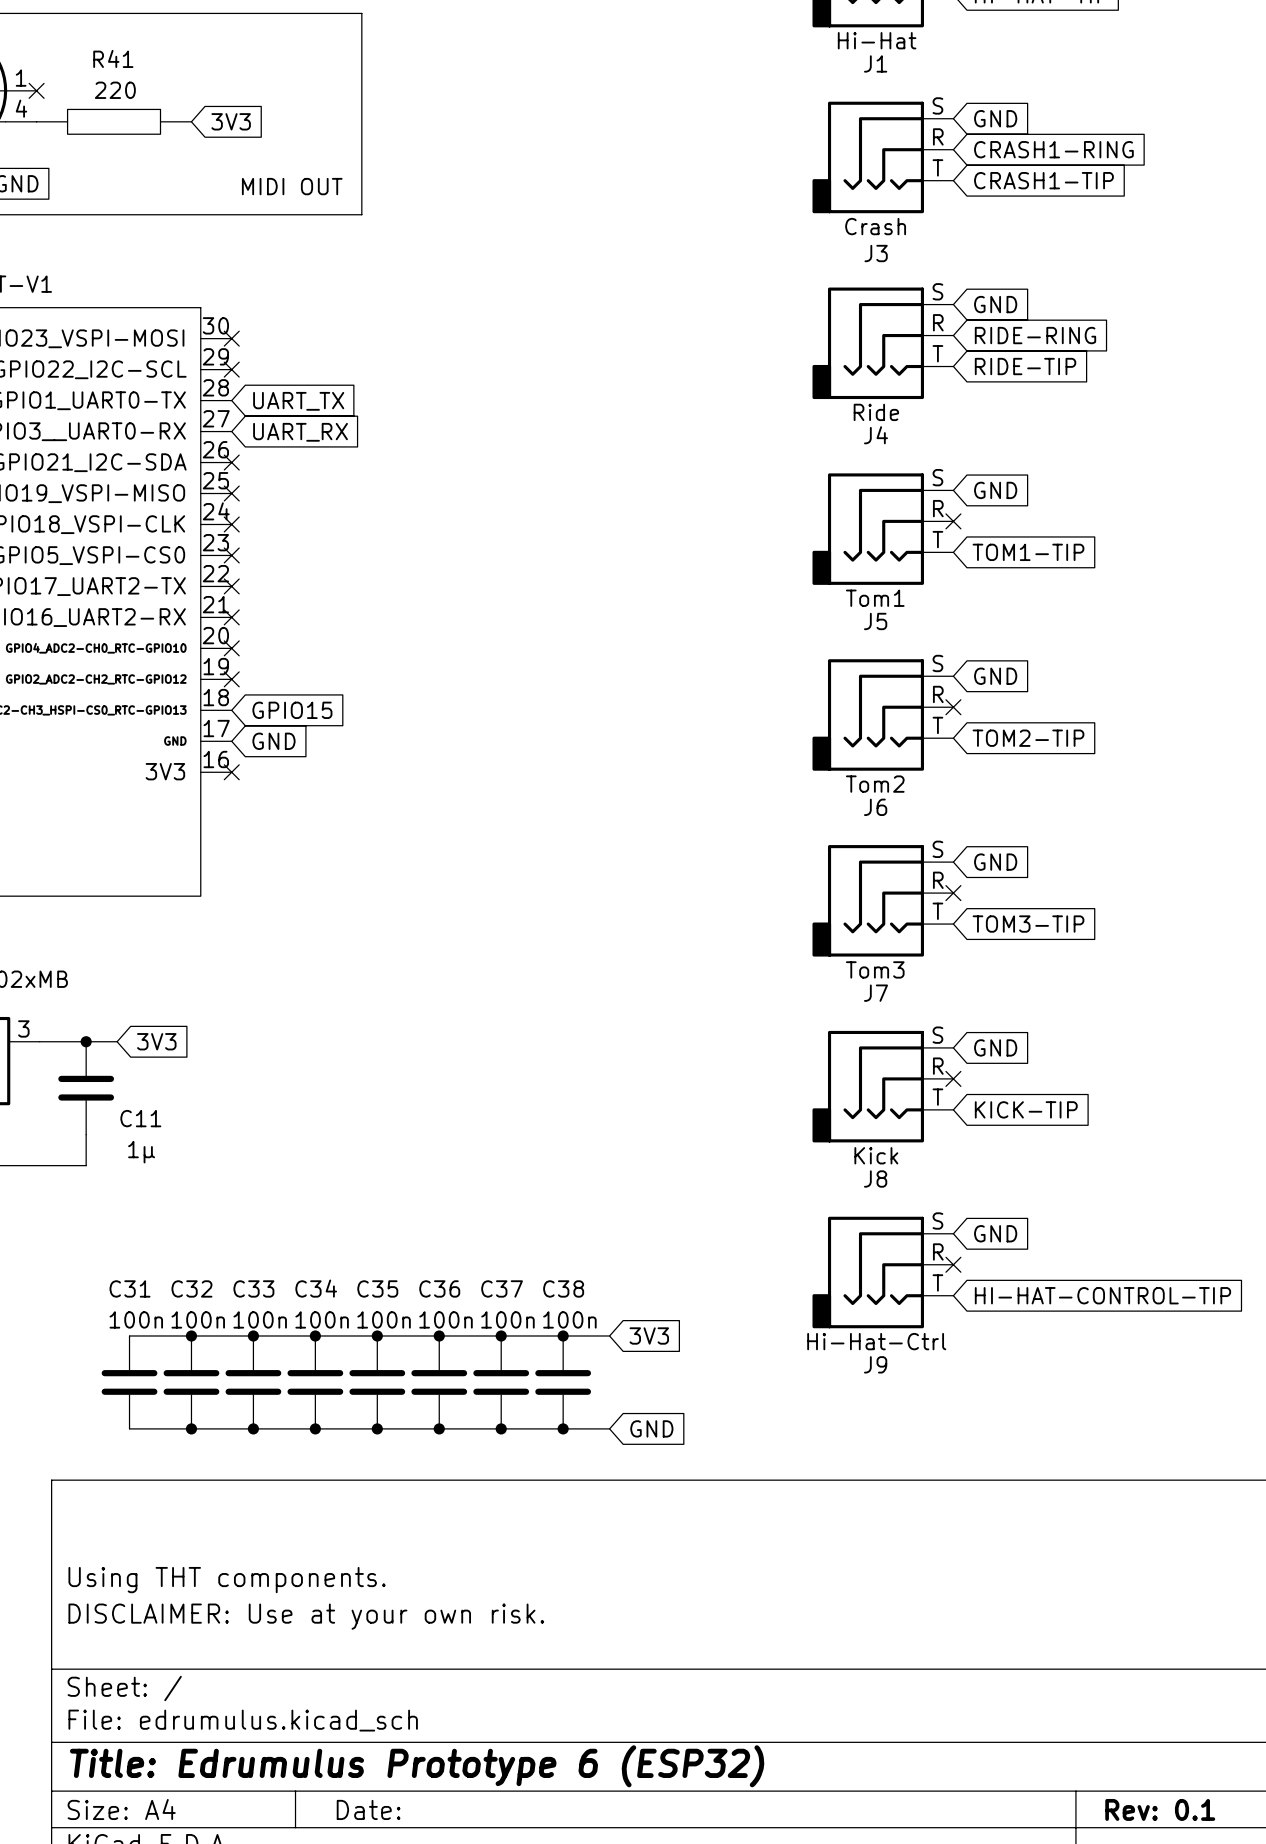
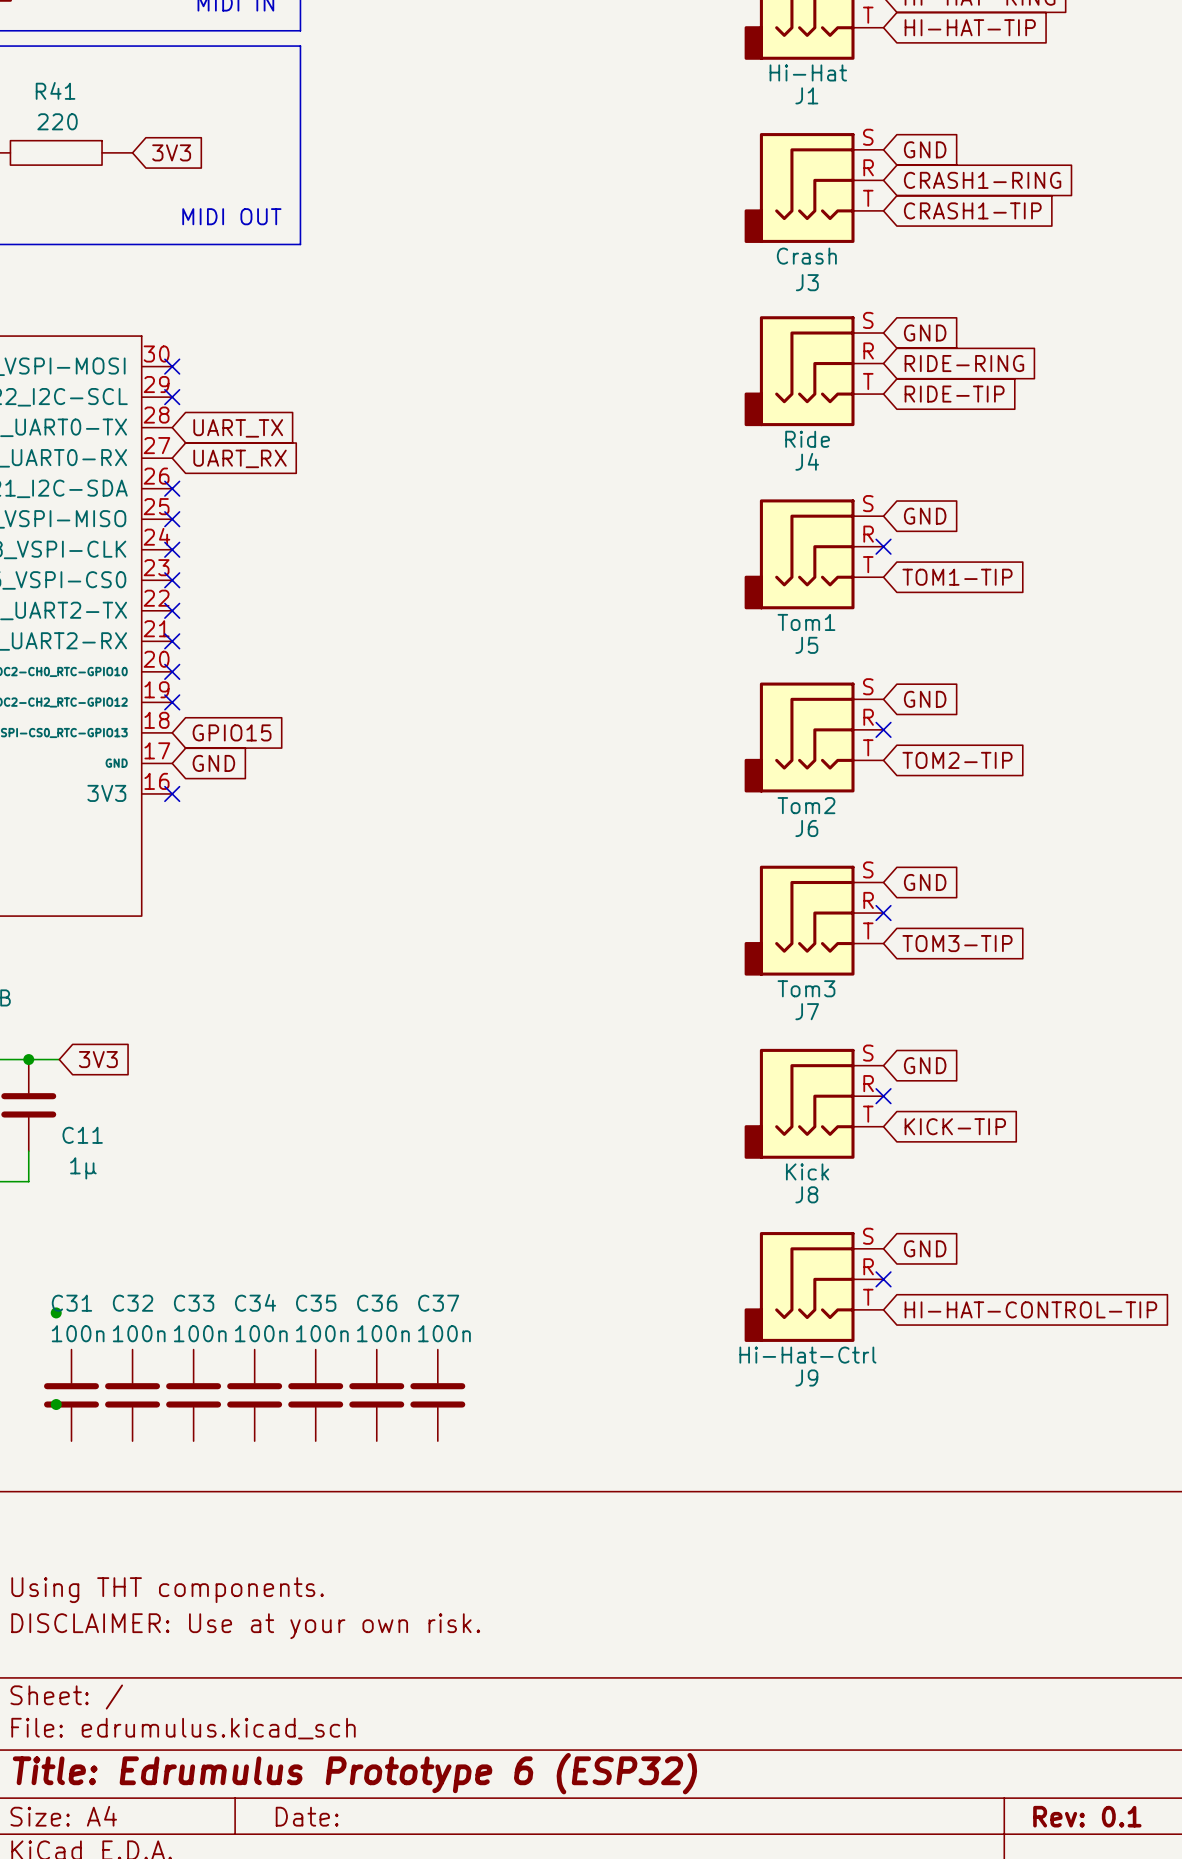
junction: none -> (56, 1312)
wire: (129, 1335) (609, 1335) -> none
junction: (191, 1335) -> none
junction: (253, 1335) -> none
junction: (315, 1335) -> none
junction: (377, 1335) -> none
junction: (439, 1335) -> none
junction: (501, 1335) -> none
junction: (563, 1335) -> none
global label: 3V3 (649, 1335) -> none
C38: 100n (563, 1382) -> none
junction: none -> (56, 1404)
wire: (129, 1428) (609, 1428) -> none
junction: (191, 1428) -> none
junction: (253, 1428) -> none
junction: (315, 1428) -> none
junction: (377, 1428) -> none
junction: (439, 1428) -> none
junction: (501, 1428) -> none
junction: (563, 1428) -> none
global label: GND (651, 1428) -> none

